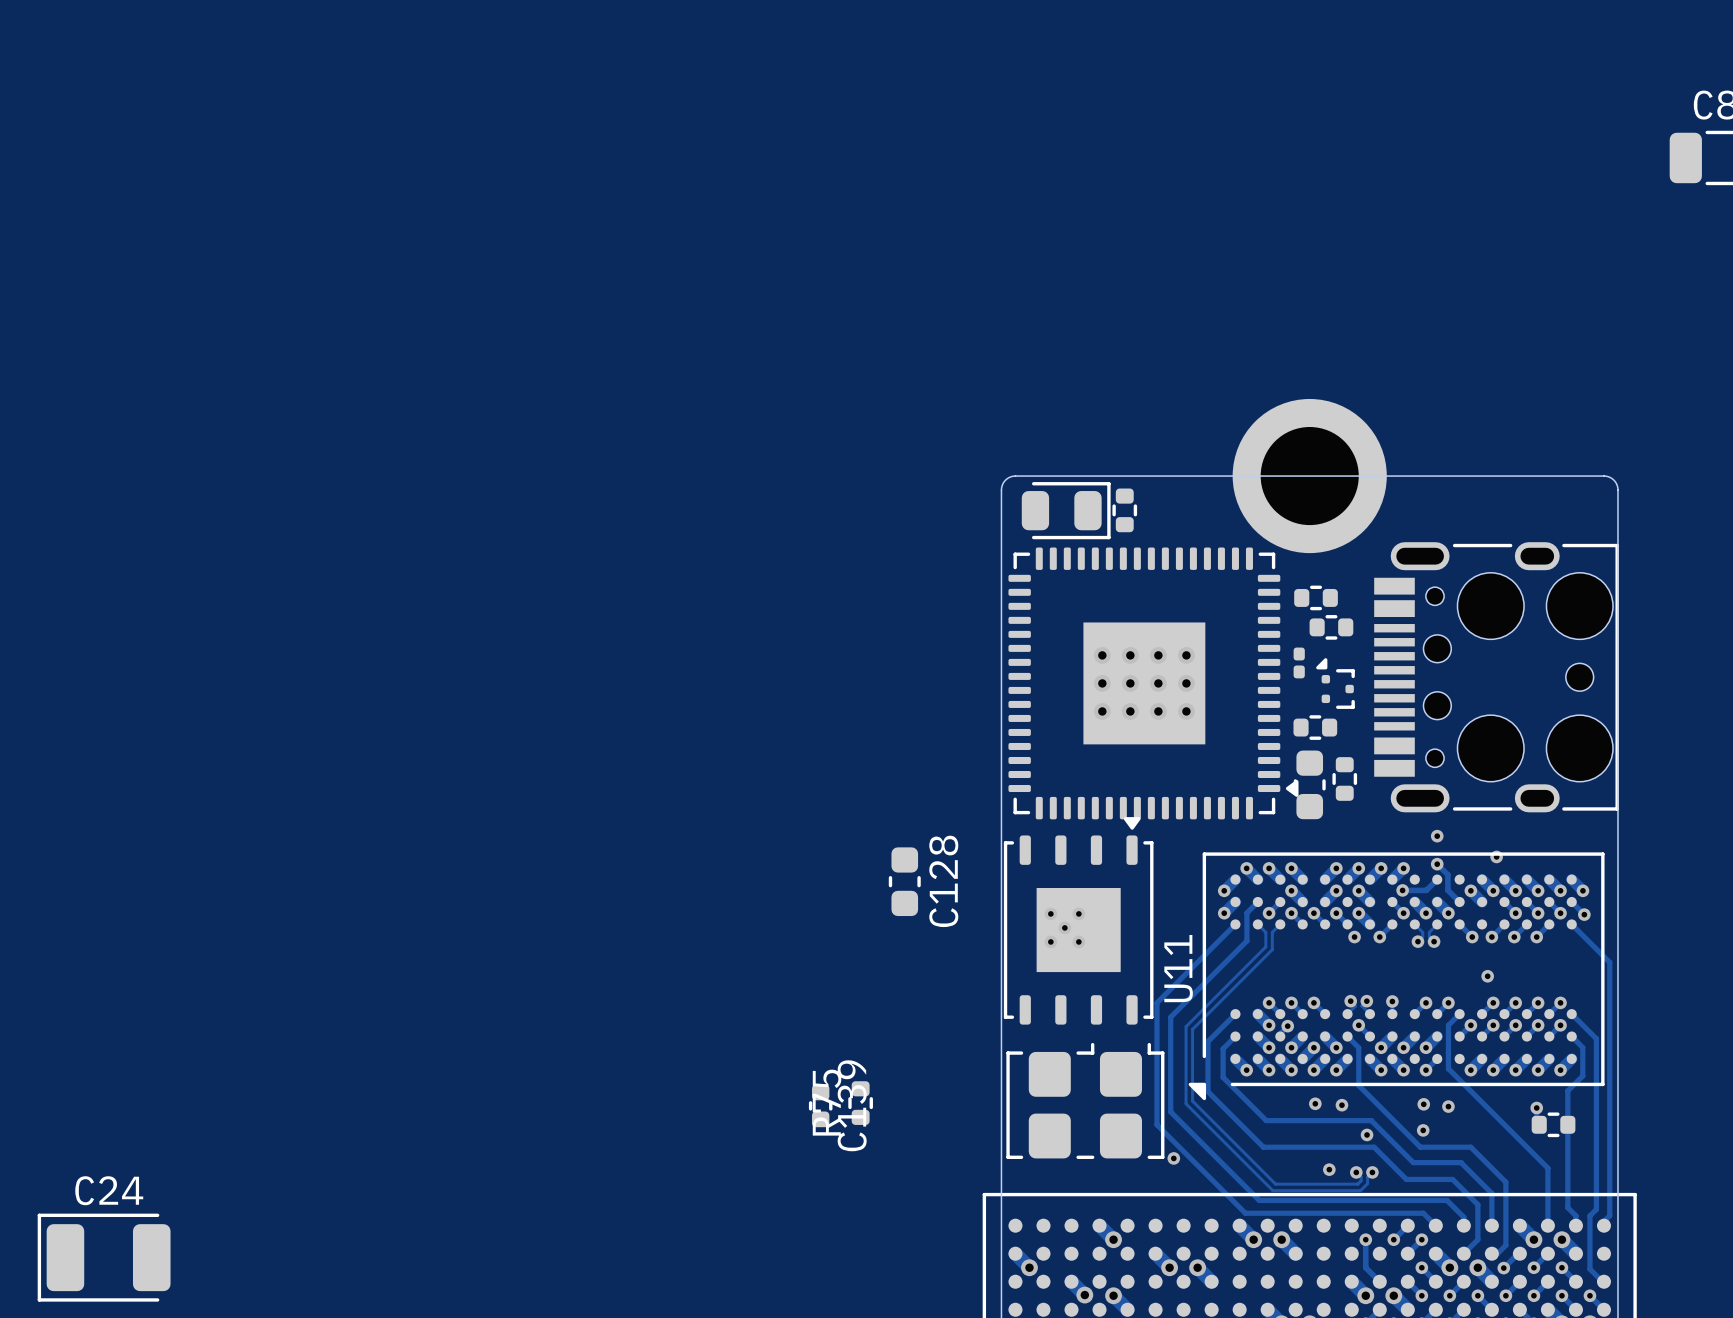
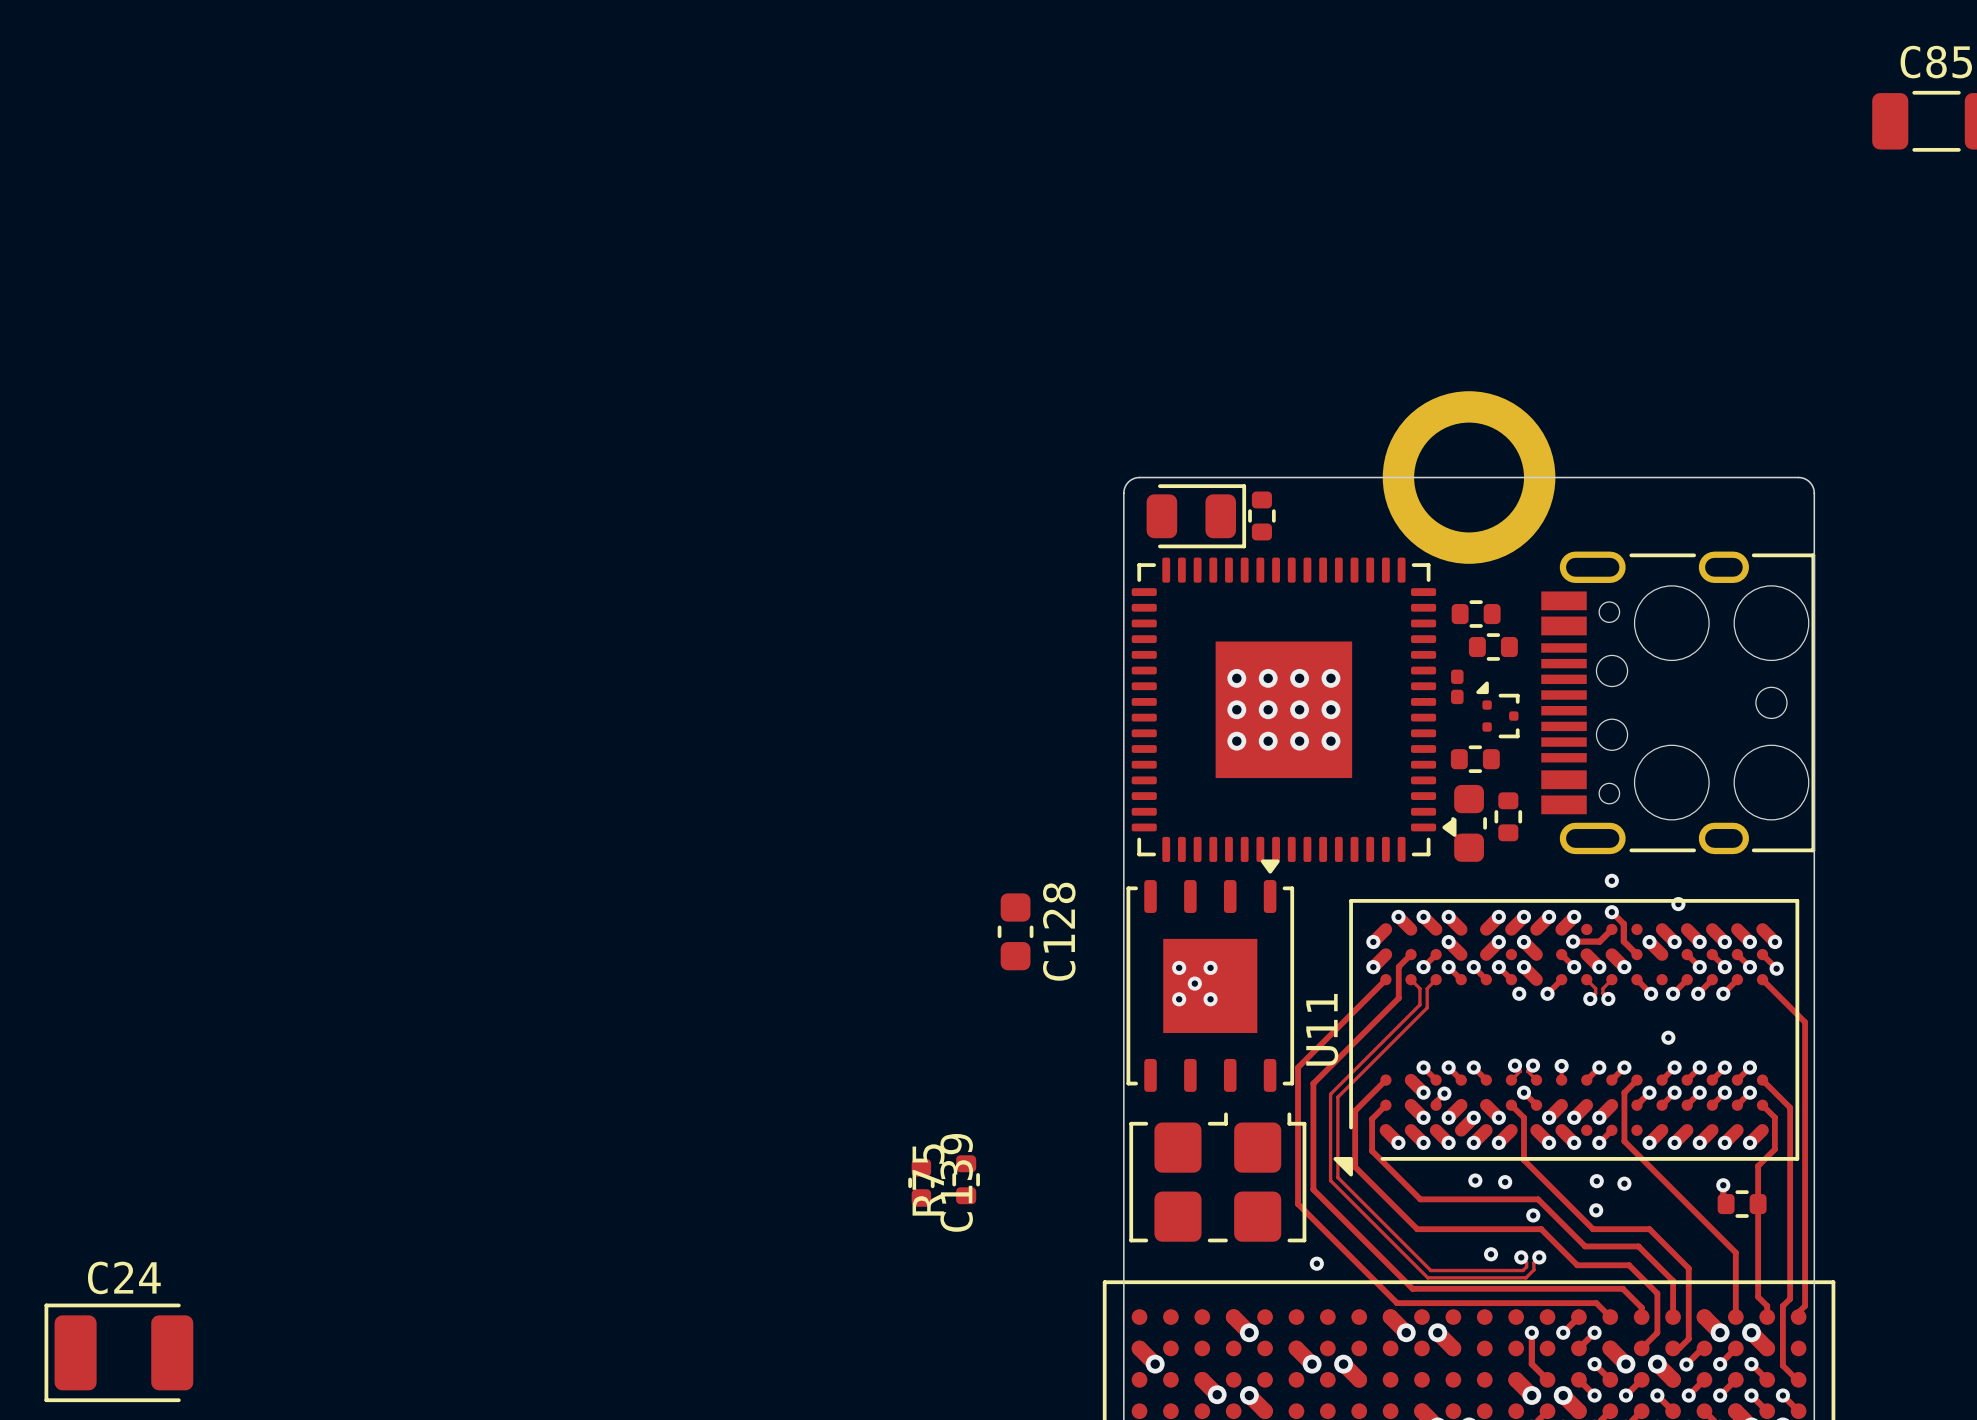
via position: (1173, 1158) -> (1316, 1263)

